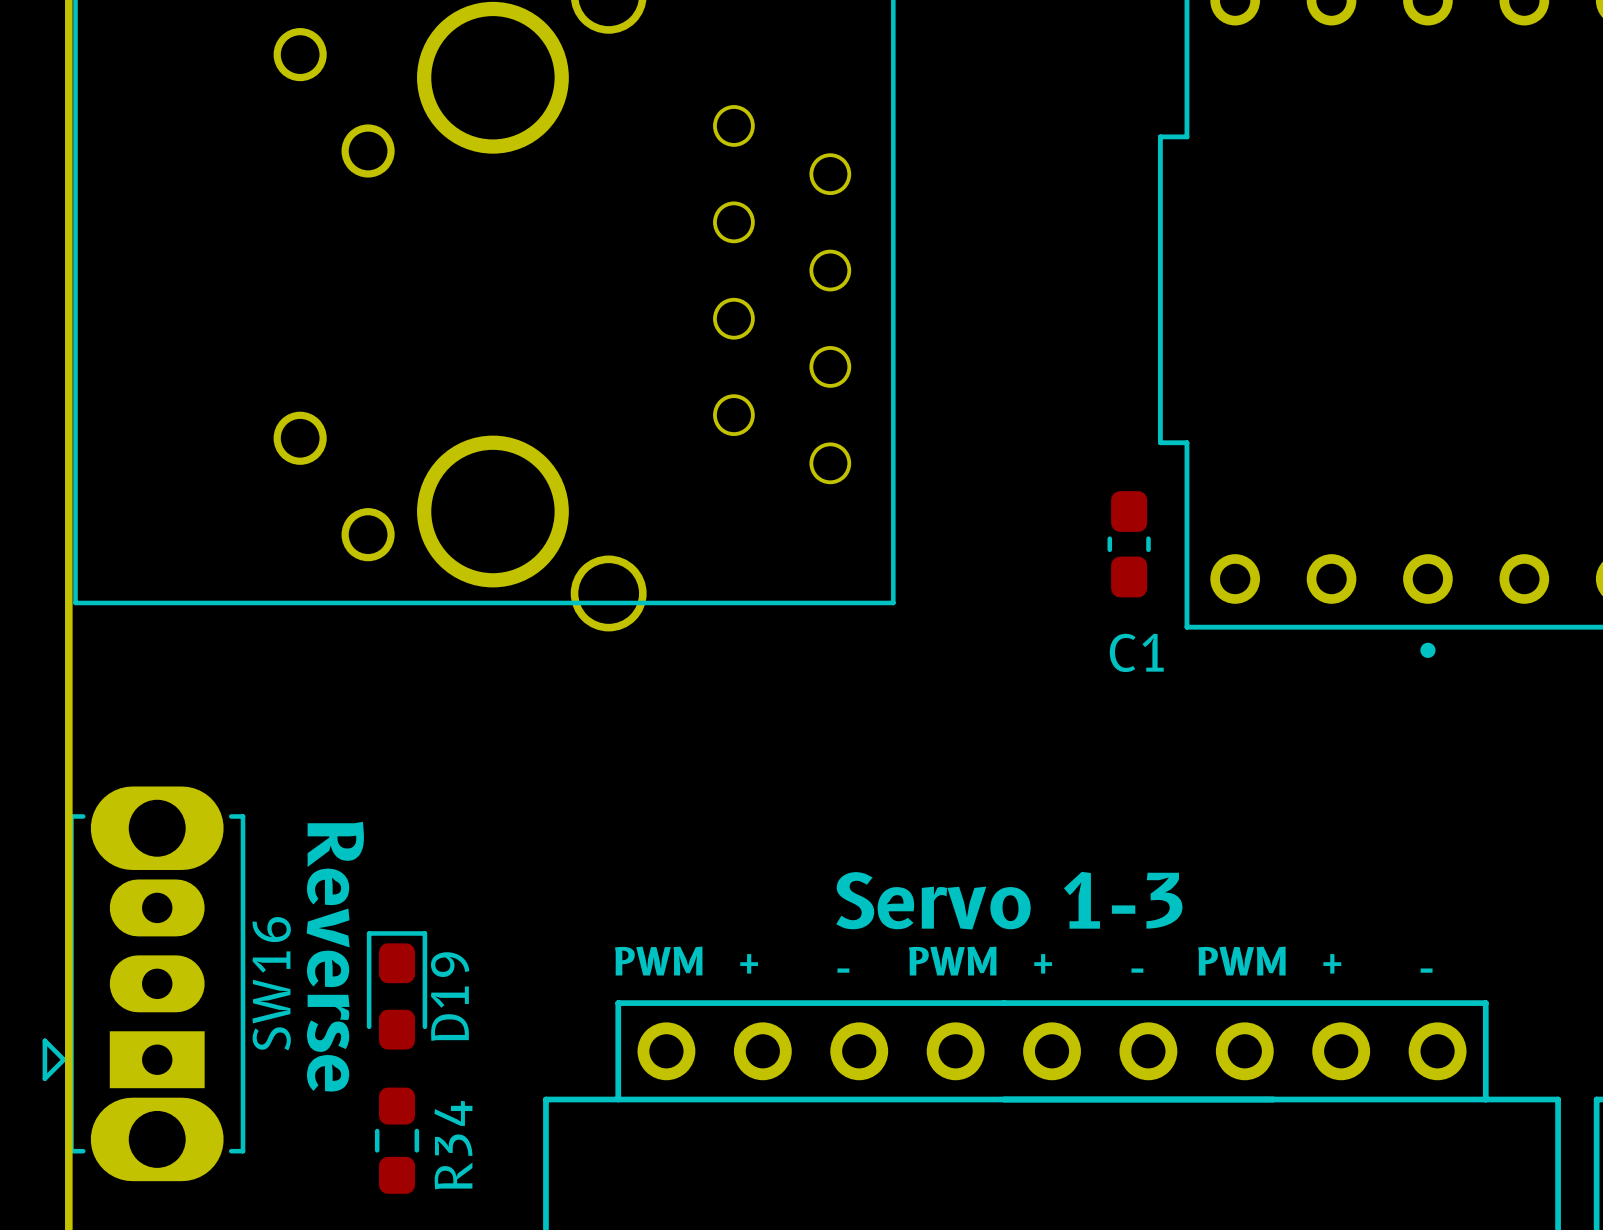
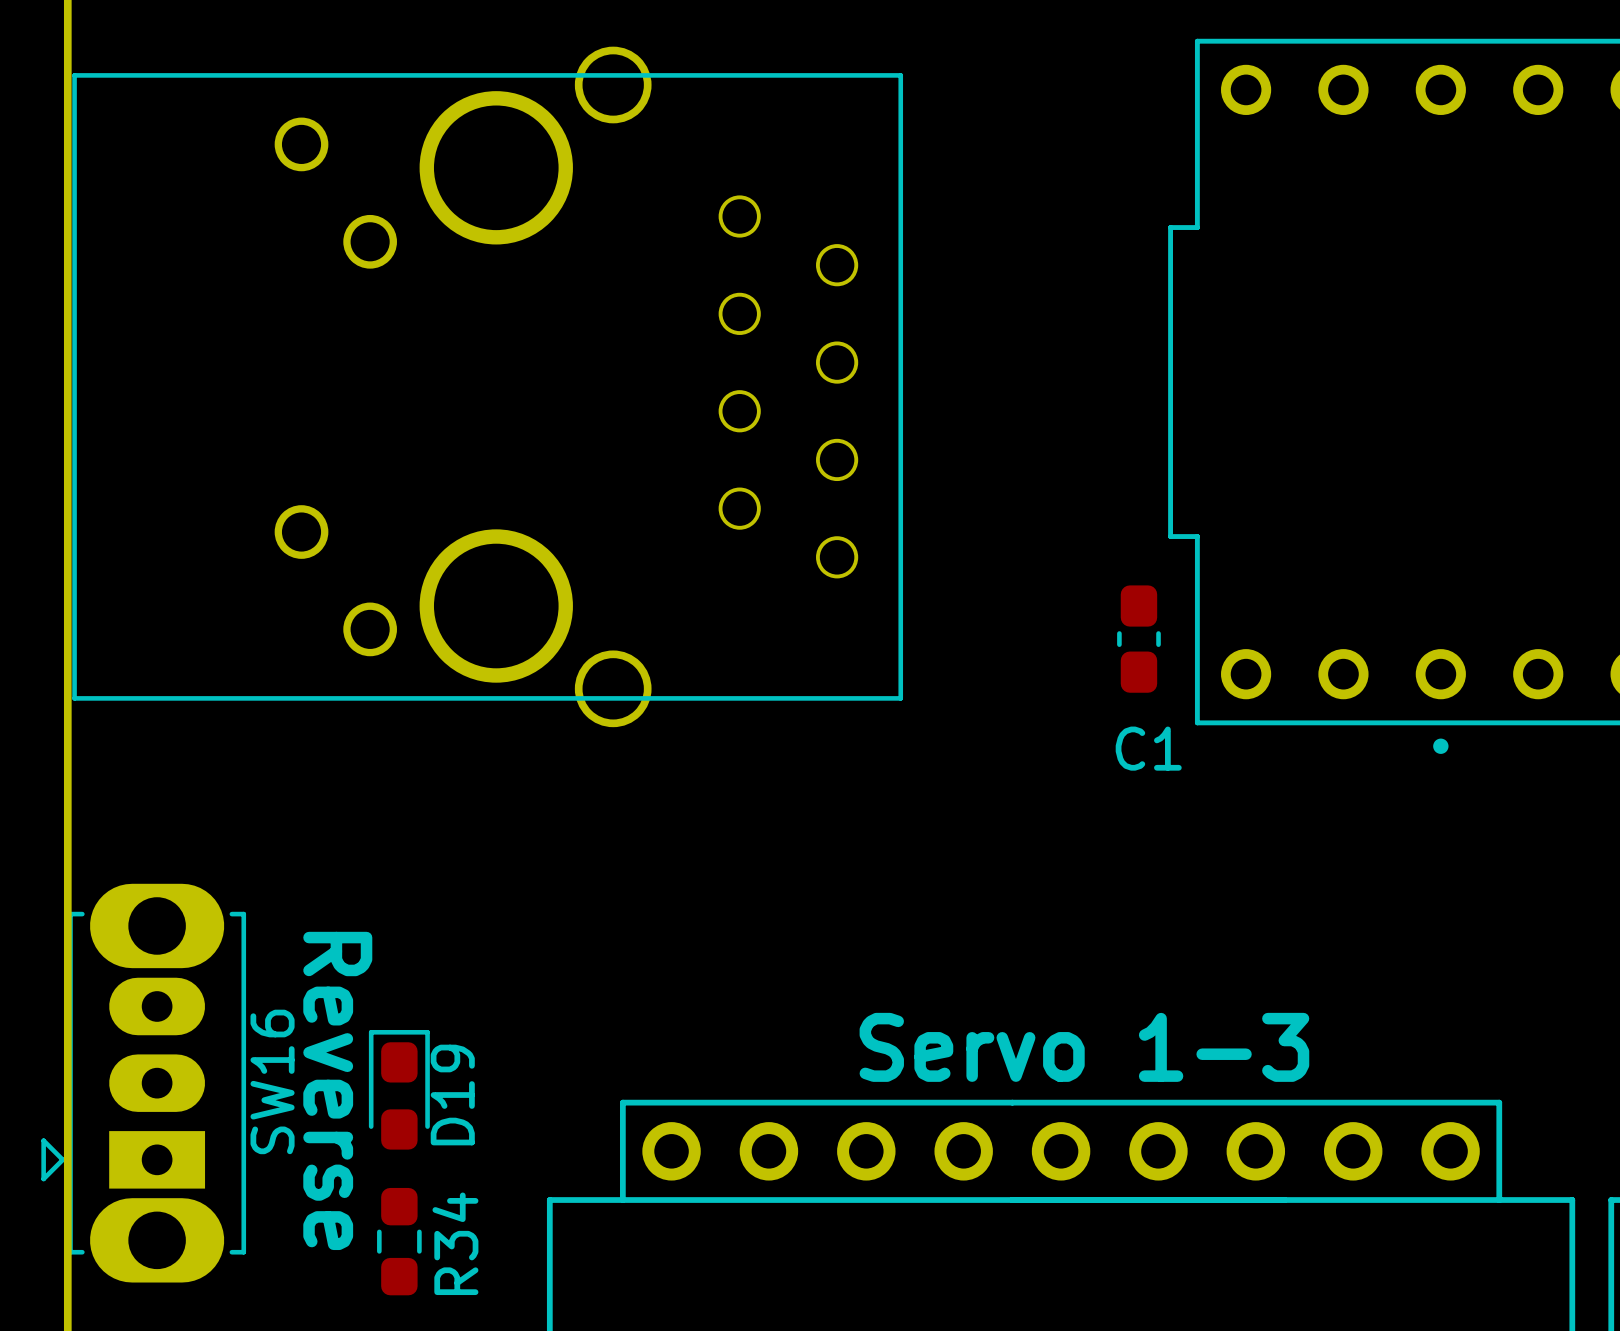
text: Servo 1-3 (1009, 900) -> none
text: PWM (658, 961) -> none
text: PWM (952, 961) -> none
text: PWM (1241, 961) -> none
text: + (749, 963) -> none
text: + (1043, 963) -> none
text: + (1332, 963) -> none
text: - (843, 970) -> Servo 1-3 (1084, 1047)
text: - (1137, 970) -> none
text: - (1426, 970) -> none

